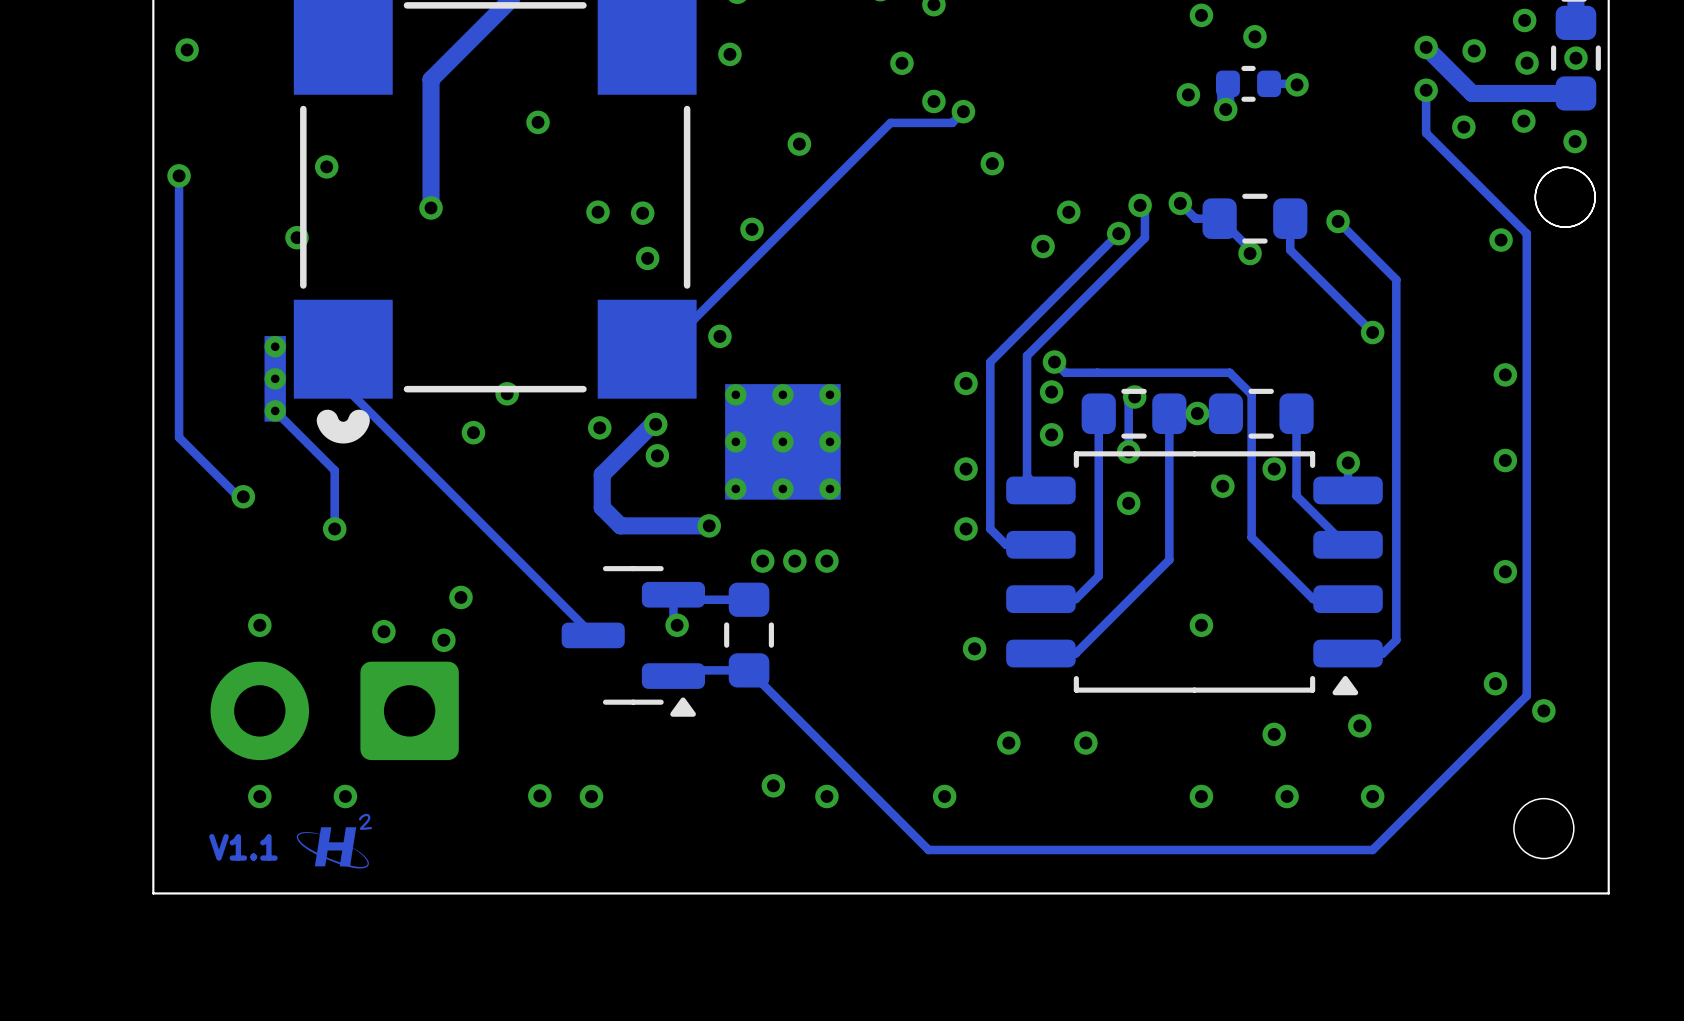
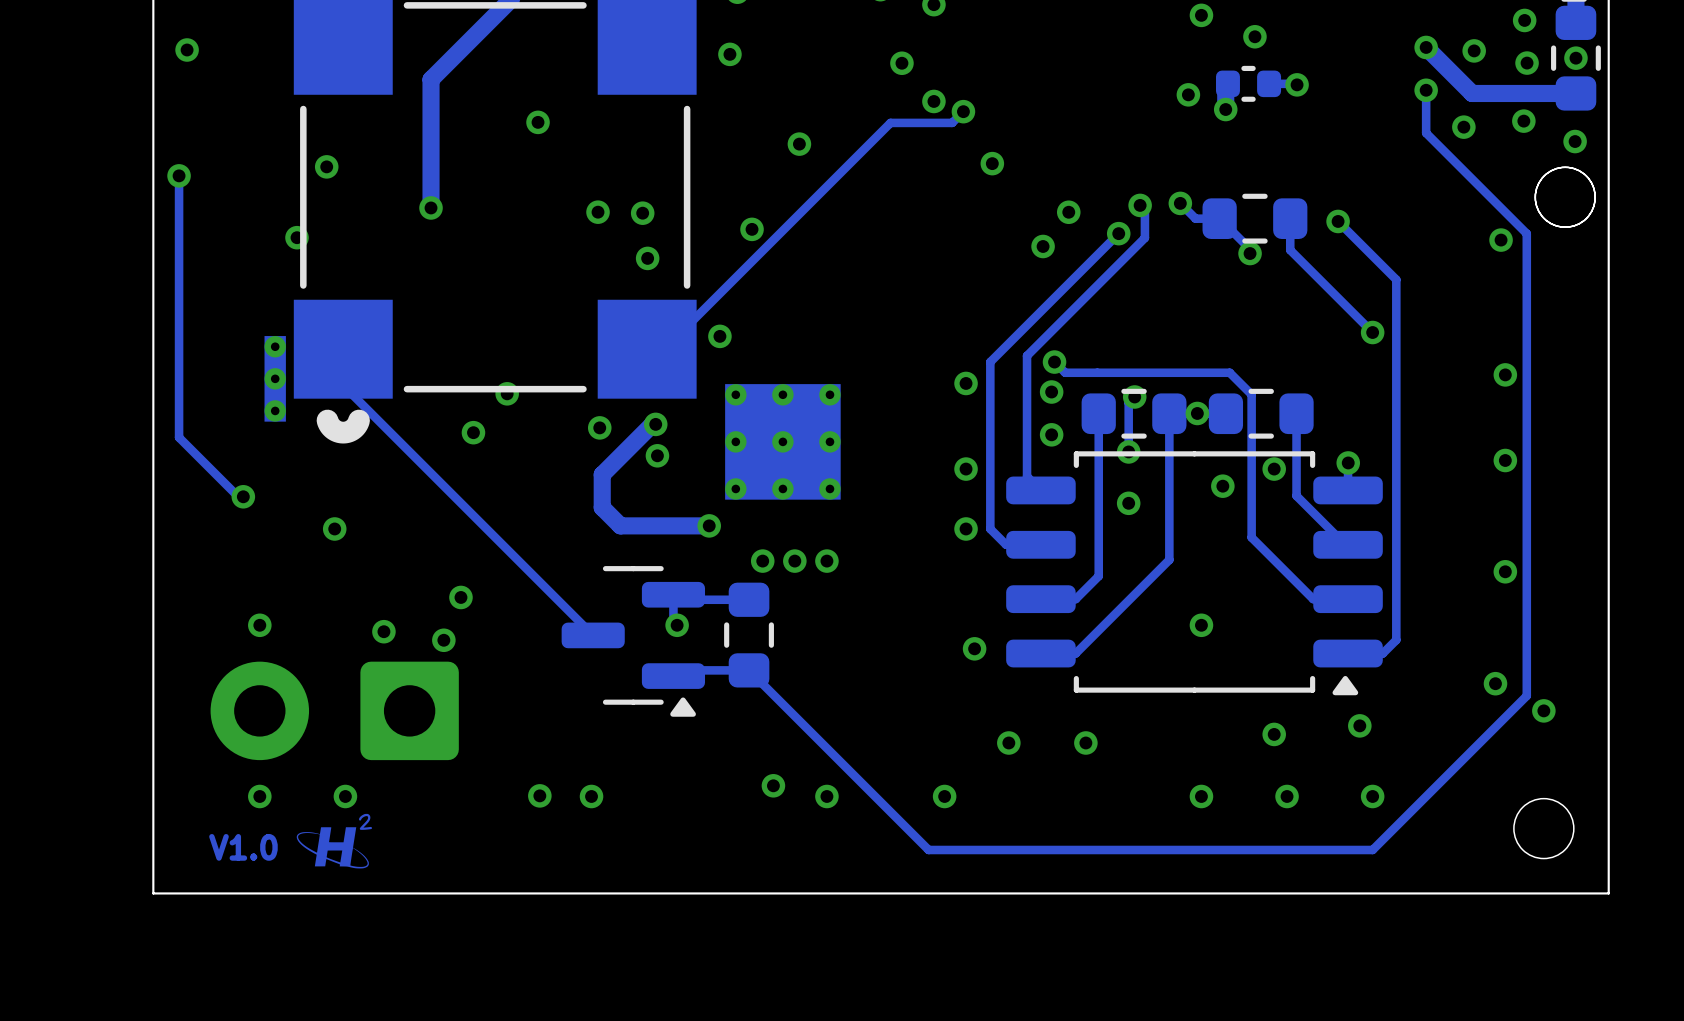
track: (275, 410) (334, 470) (334, 528) -> none
text: V1.1 (243, 847) -> V1.0 (243, 847)

